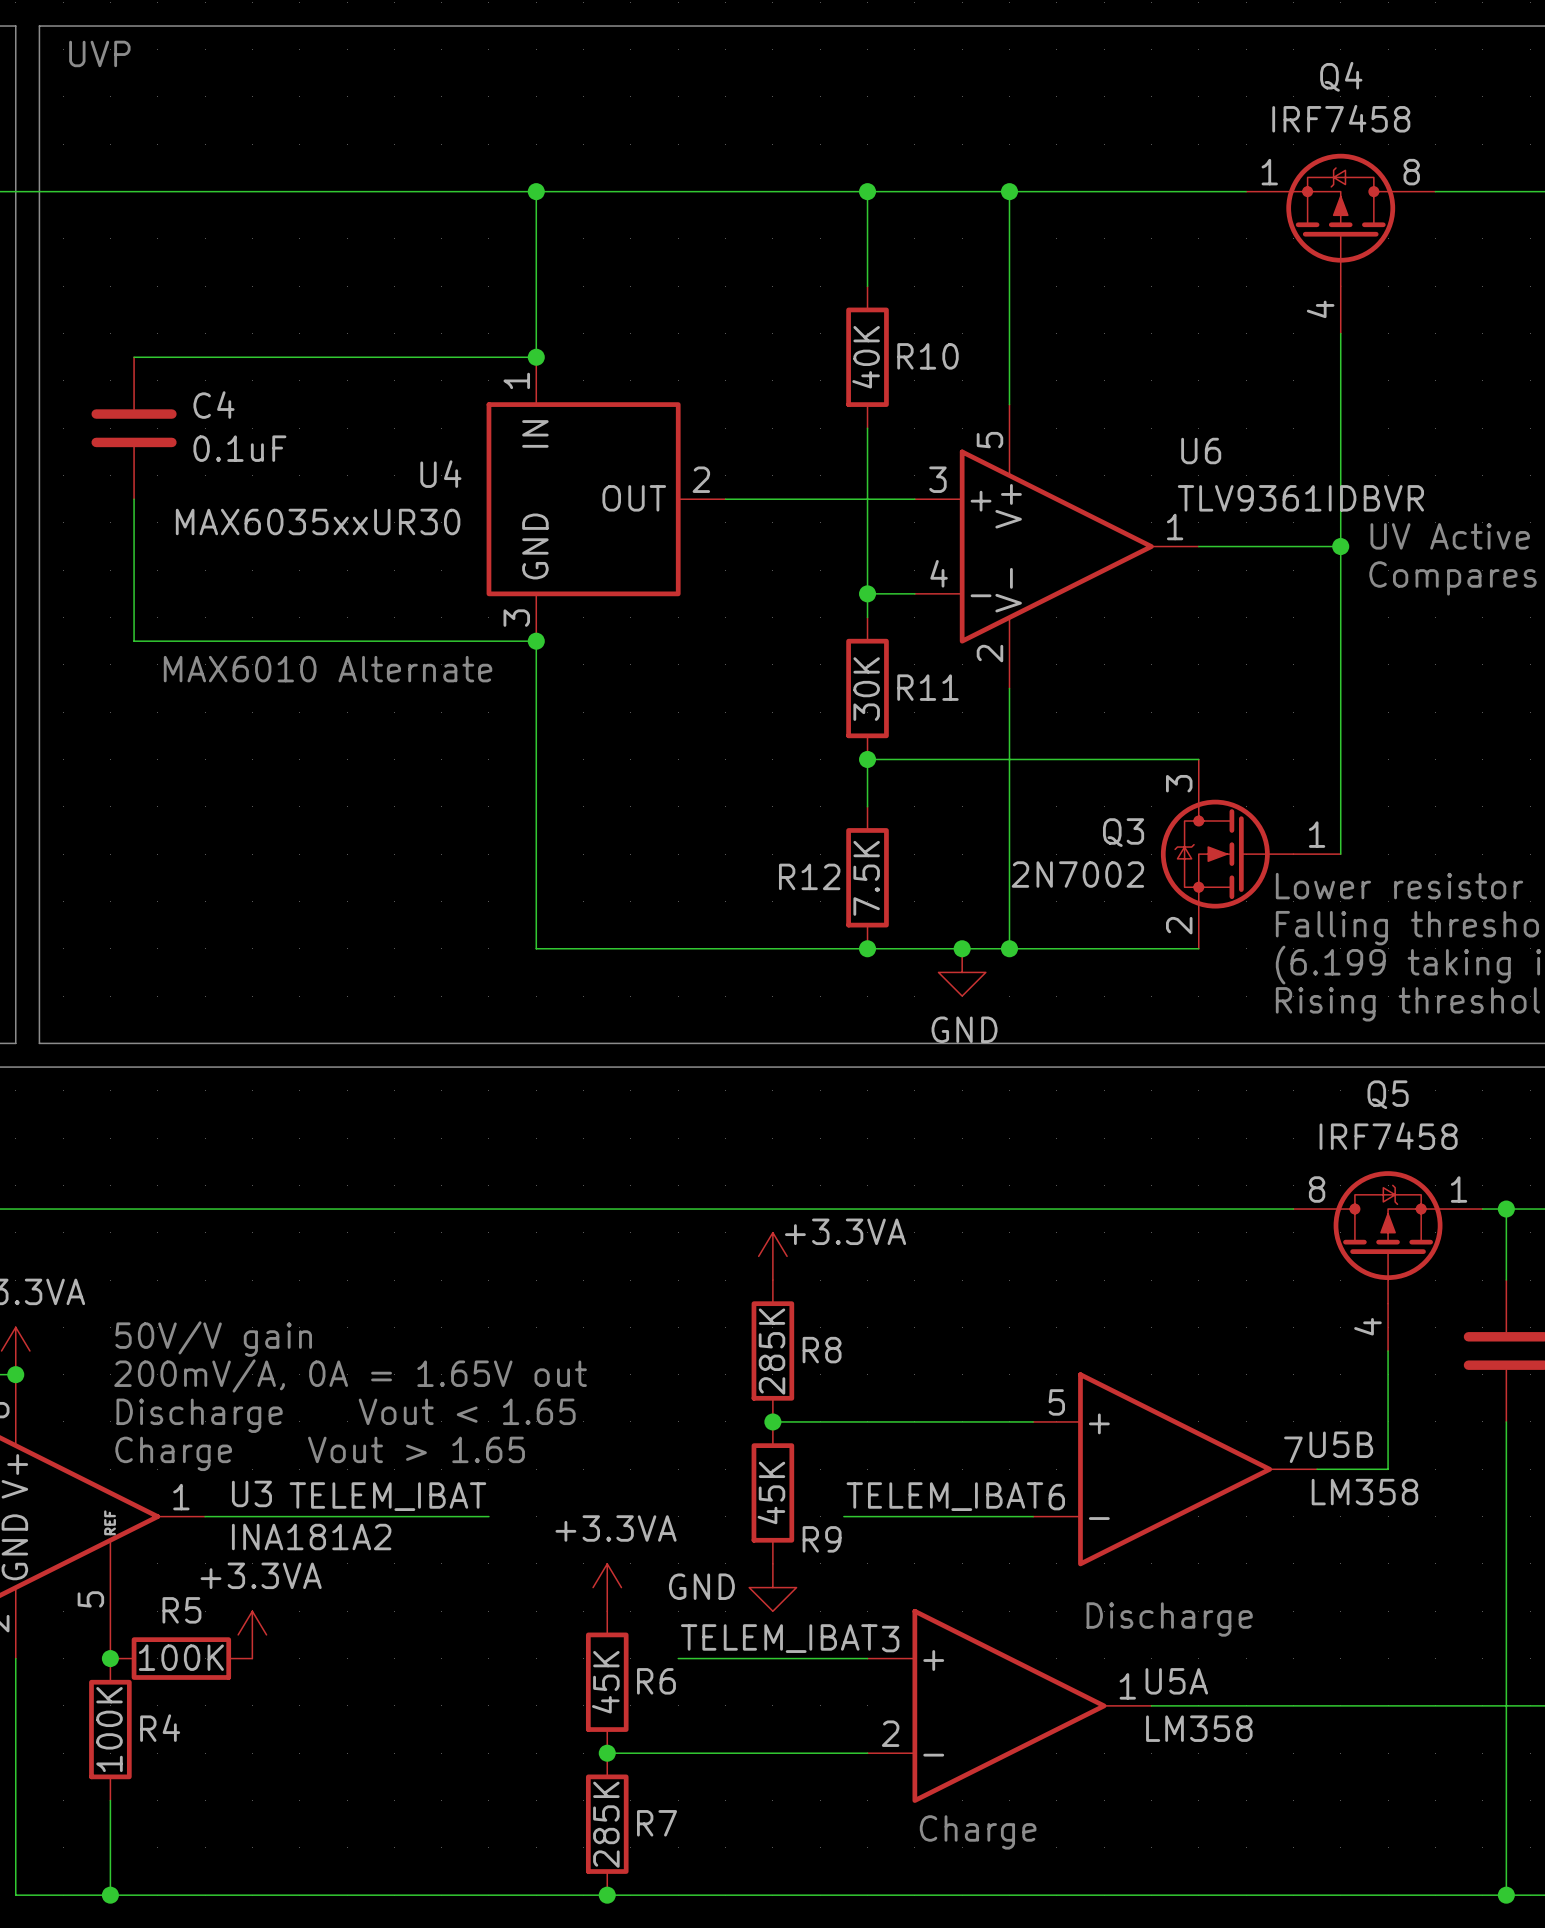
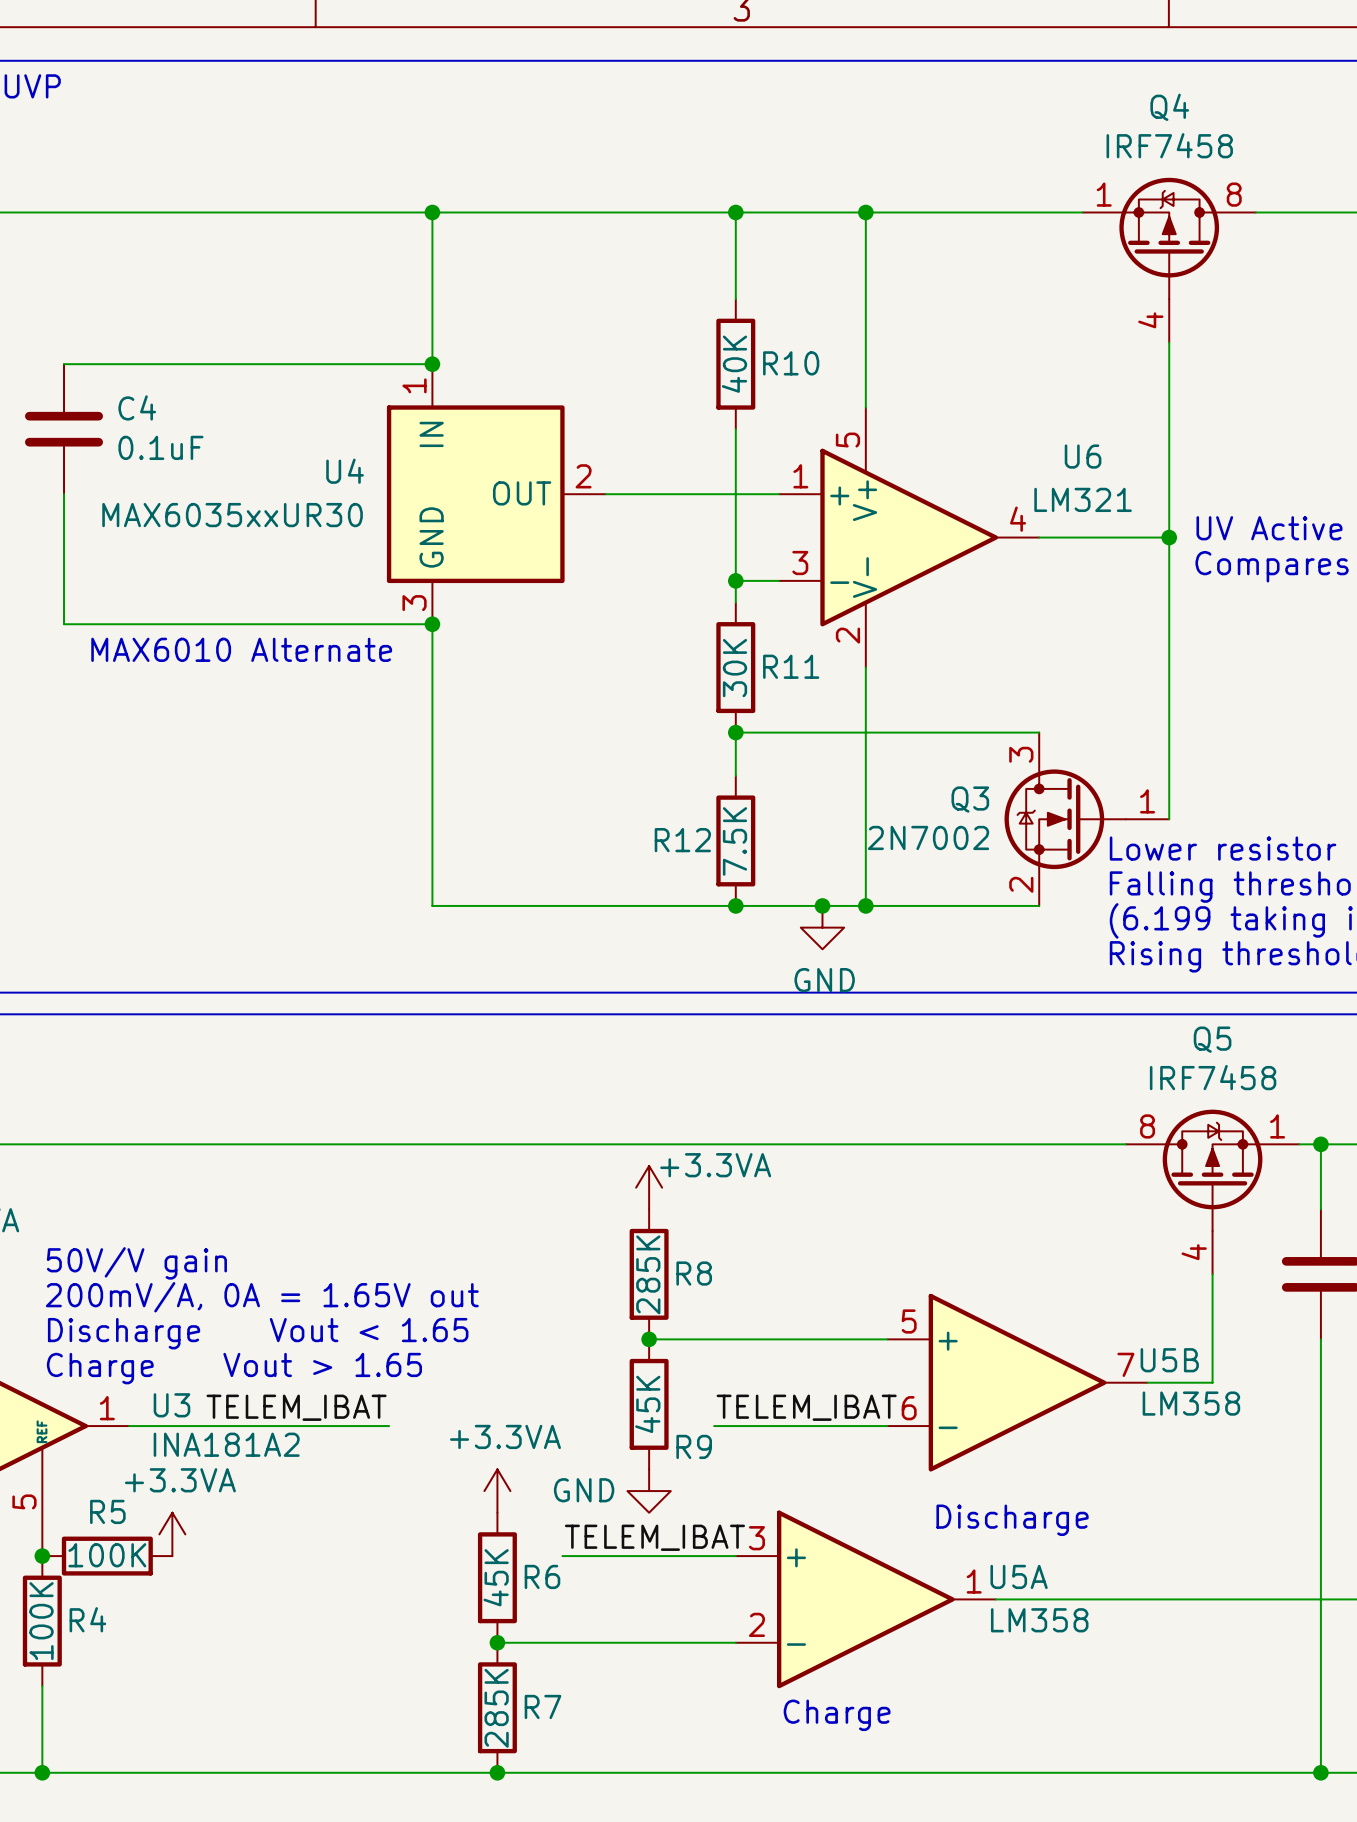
U6 name position: U6 (1201, 451) -> U6 (1083, 456)
U6 pin number: 3 (937, 479) -> 1 (800, 476)
U6 value: TLV9361IDBVR (1300, 498) -> LM321 (1083, 499)
U6 pin number: 1 (1175, 527) -> 4 (1018, 519)
U6 pin number: 4 (939, 573) -> 3 (800, 563)

